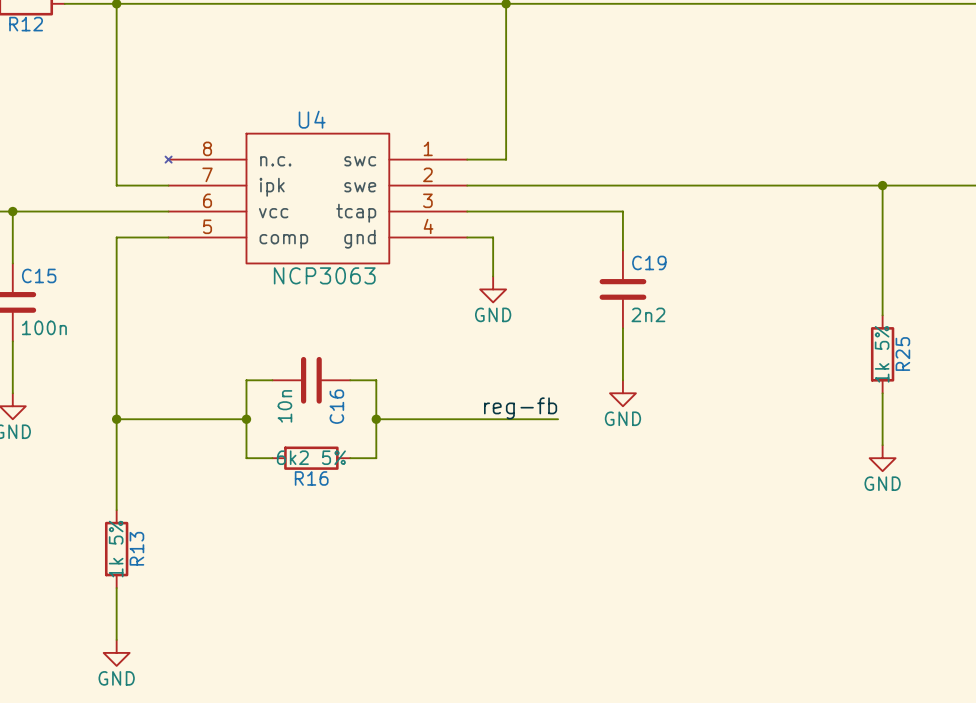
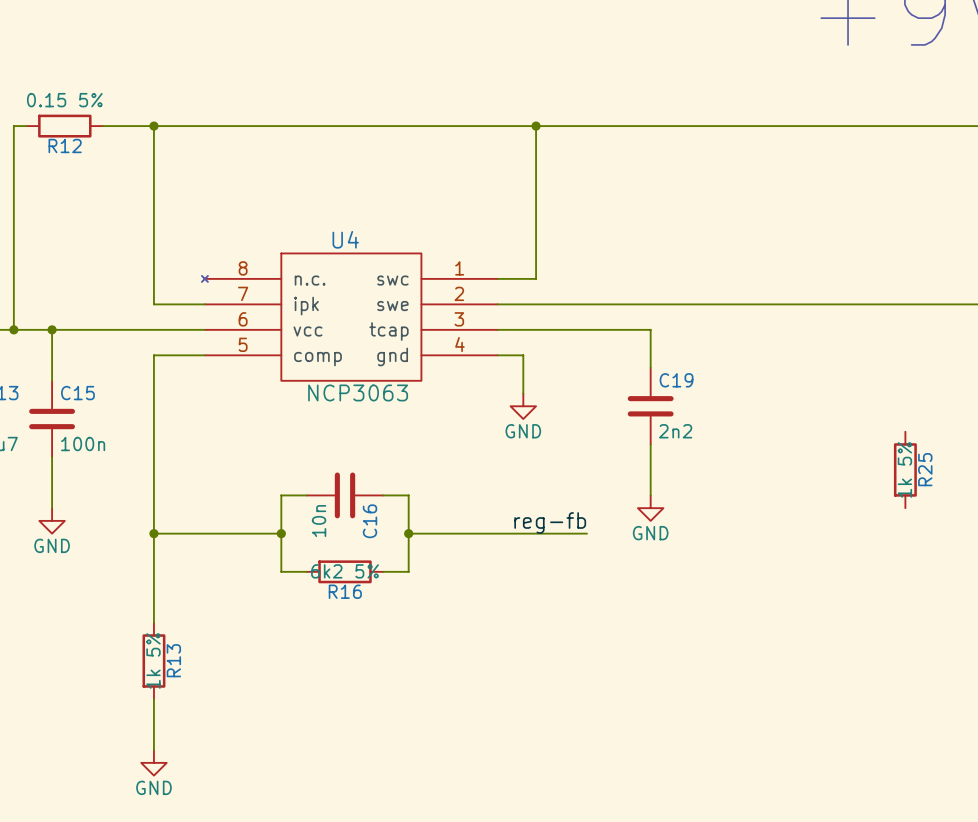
wire: (882, 185) (882, 315) -> none
junction: (882, 185) -> none
wire: (882, 393) (882, 445) -> none
power symbol: GND (882, 458) -> none

